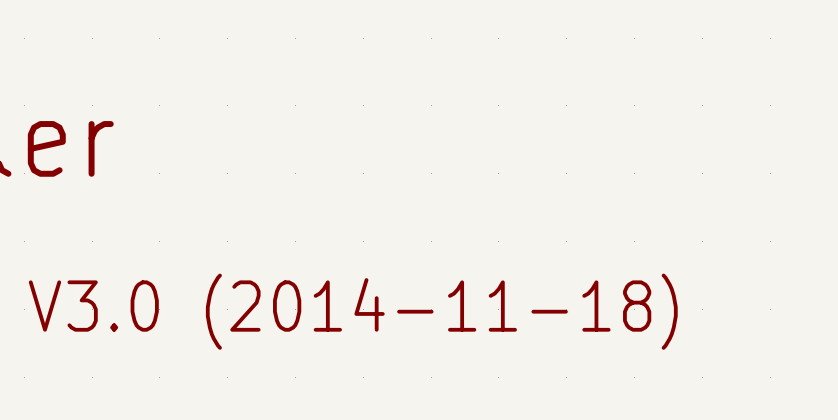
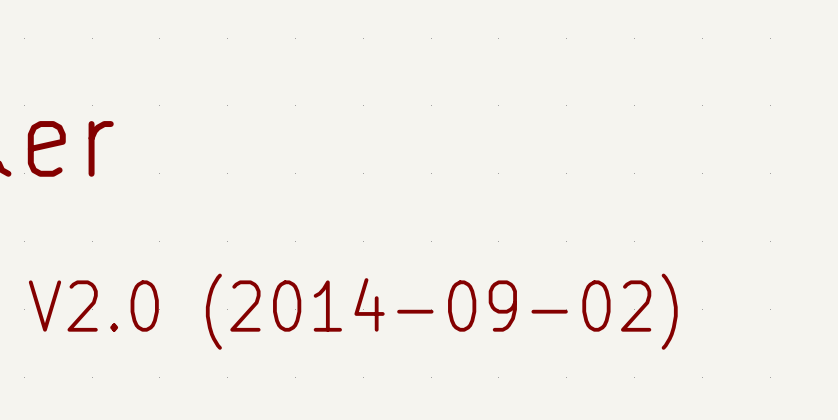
text: V3.0 (2014-11-18) (353, 311) -> V2.0 (2014-09-02) (353, 311)

